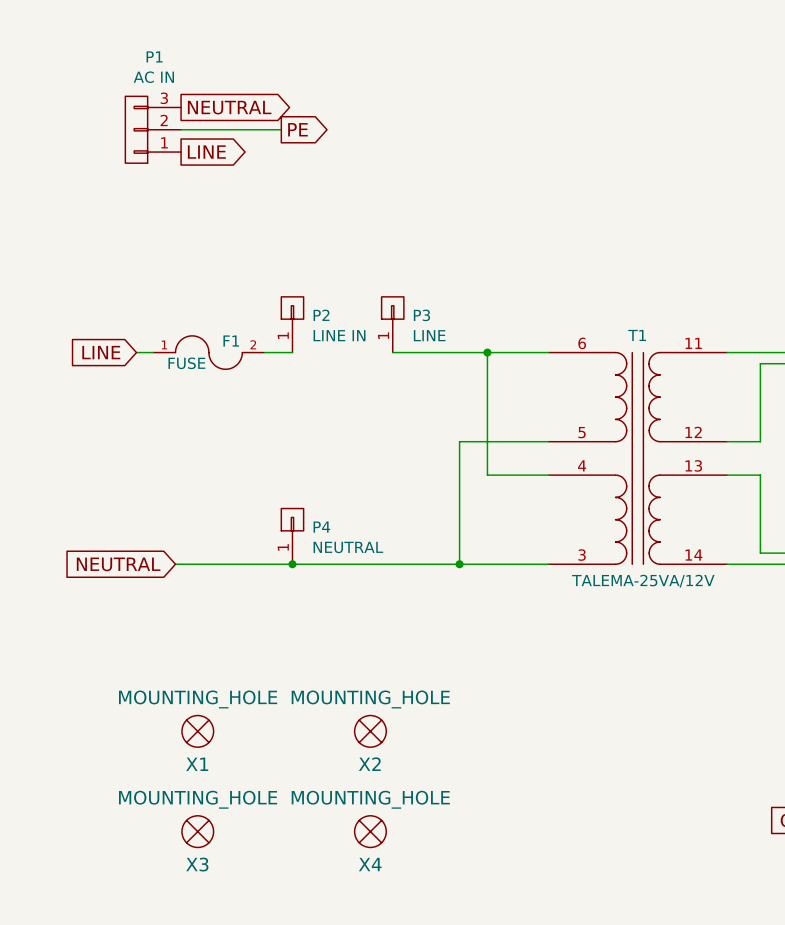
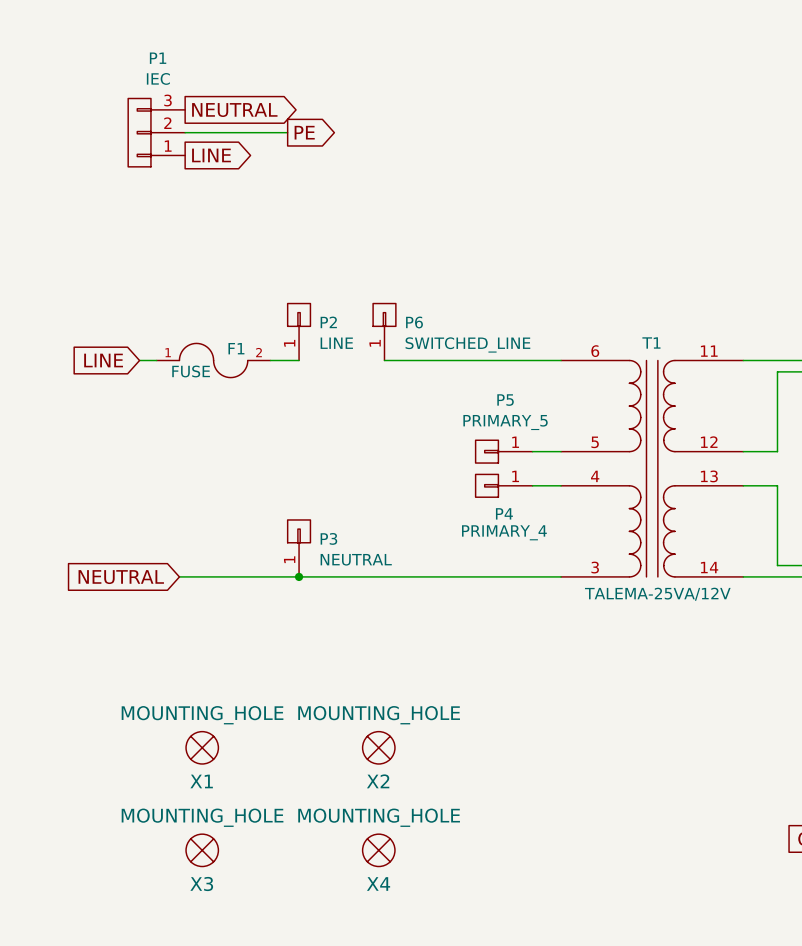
P1 value: AC IN (153, 77) -> IEC (158, 78)
P6: none -> SWITCHED_LINE (384, 332)
P3: LINE (392, 324) -> none
P2 value: LINE IN (339, 335) -> LINE (336, 343)
wire: none -> (384, 360) (401, 360)
wire: (487, 352) (487, 475) (520, 475) -> none
junction: (487, 352) -> none
P5: none -> PRIMARY_5 (504, 451)
wire: (520, 441) (459, 441) (459, 564) -> none
P4: none -> PRIMARY_4 (504, 485)
P4 name: P4 (321, 527) -> P3 (328, 538)
junction: (459, 564) -> none

